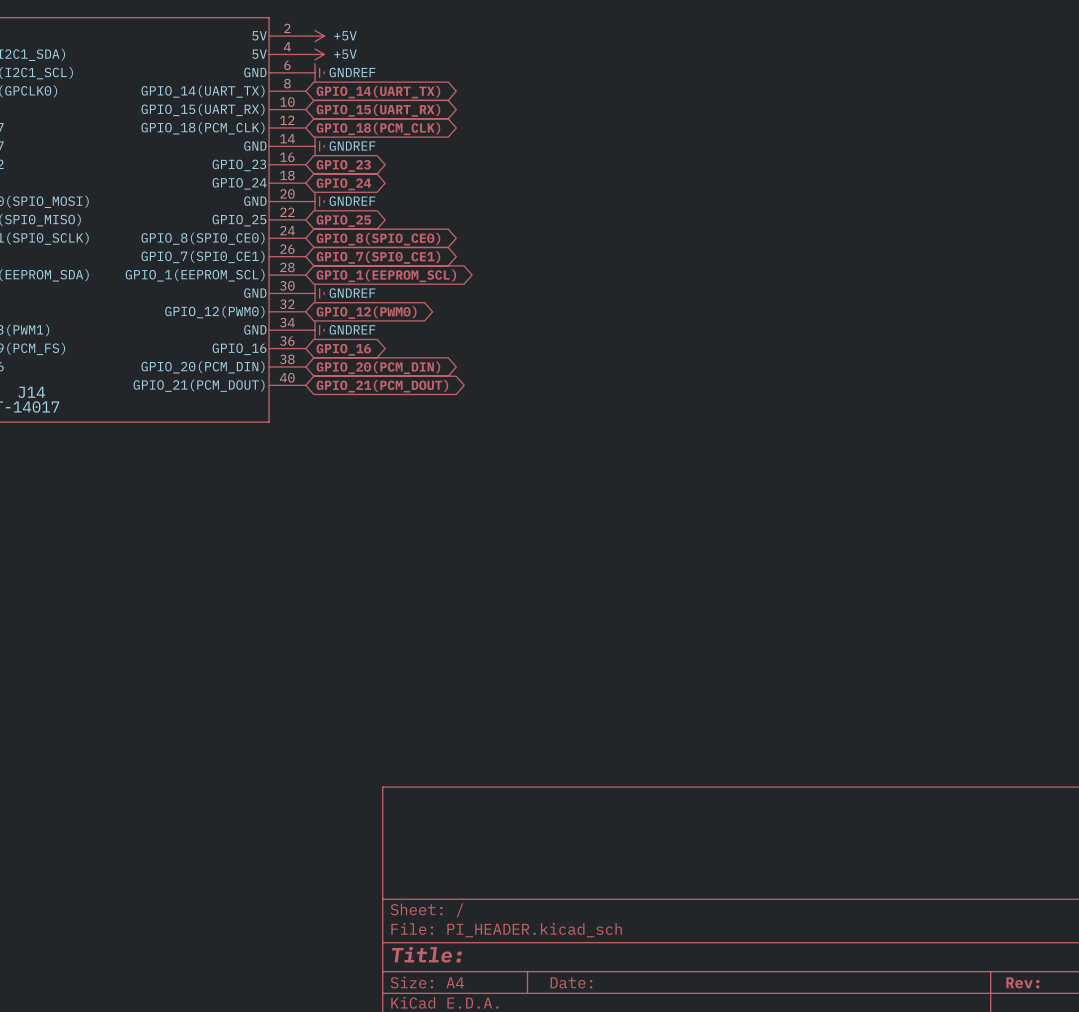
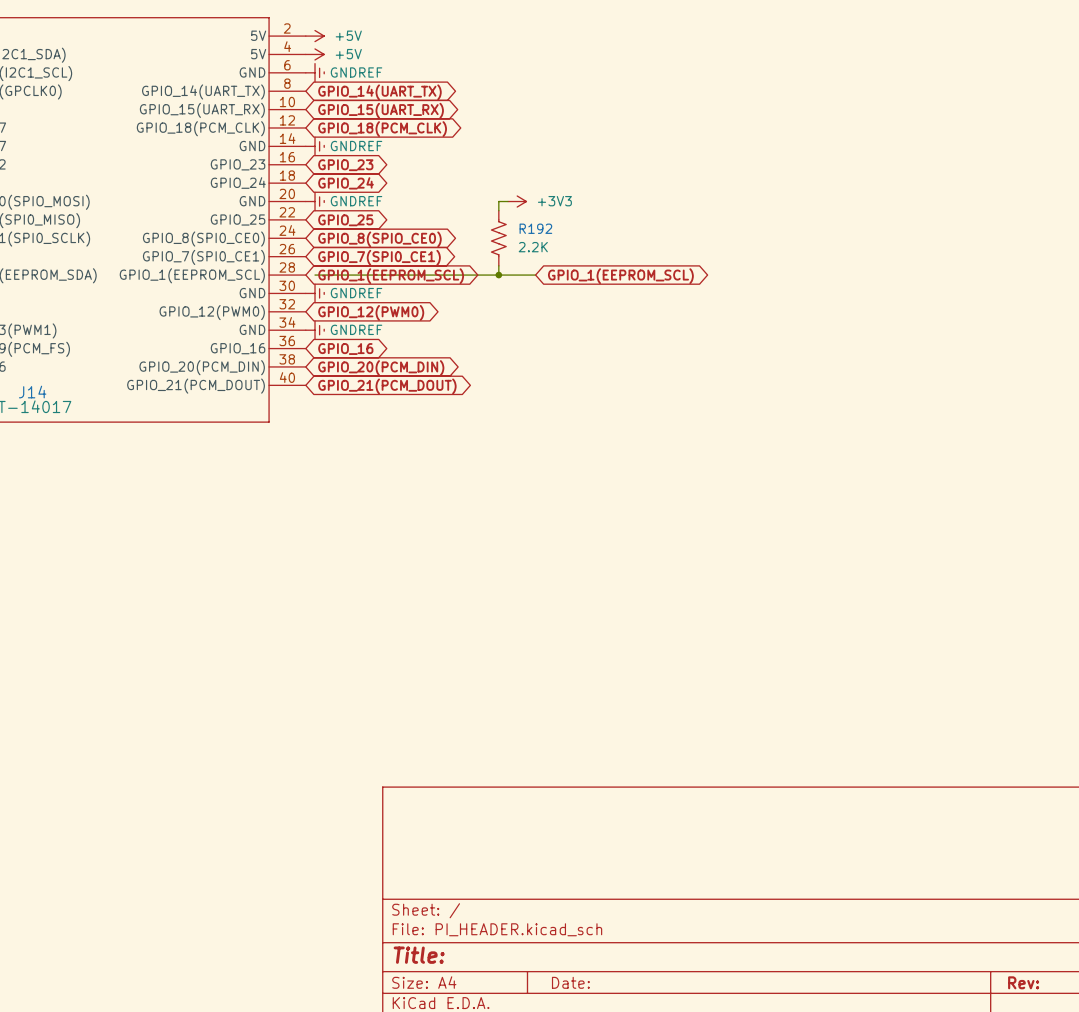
wire: none -> (508, 201) (498, 201) (498, 210)
power symbol: none -> +3V3 (517, 201)
R192: none -> 2.2K (498, 238)
wire: none -> (498, 265) (498, 275)
wire: none -> (315, 275) (535, 275)
junction: none -> (498, 275)
global label: none -> GPIO_1(EEPROM_SCL) (620, 276)

